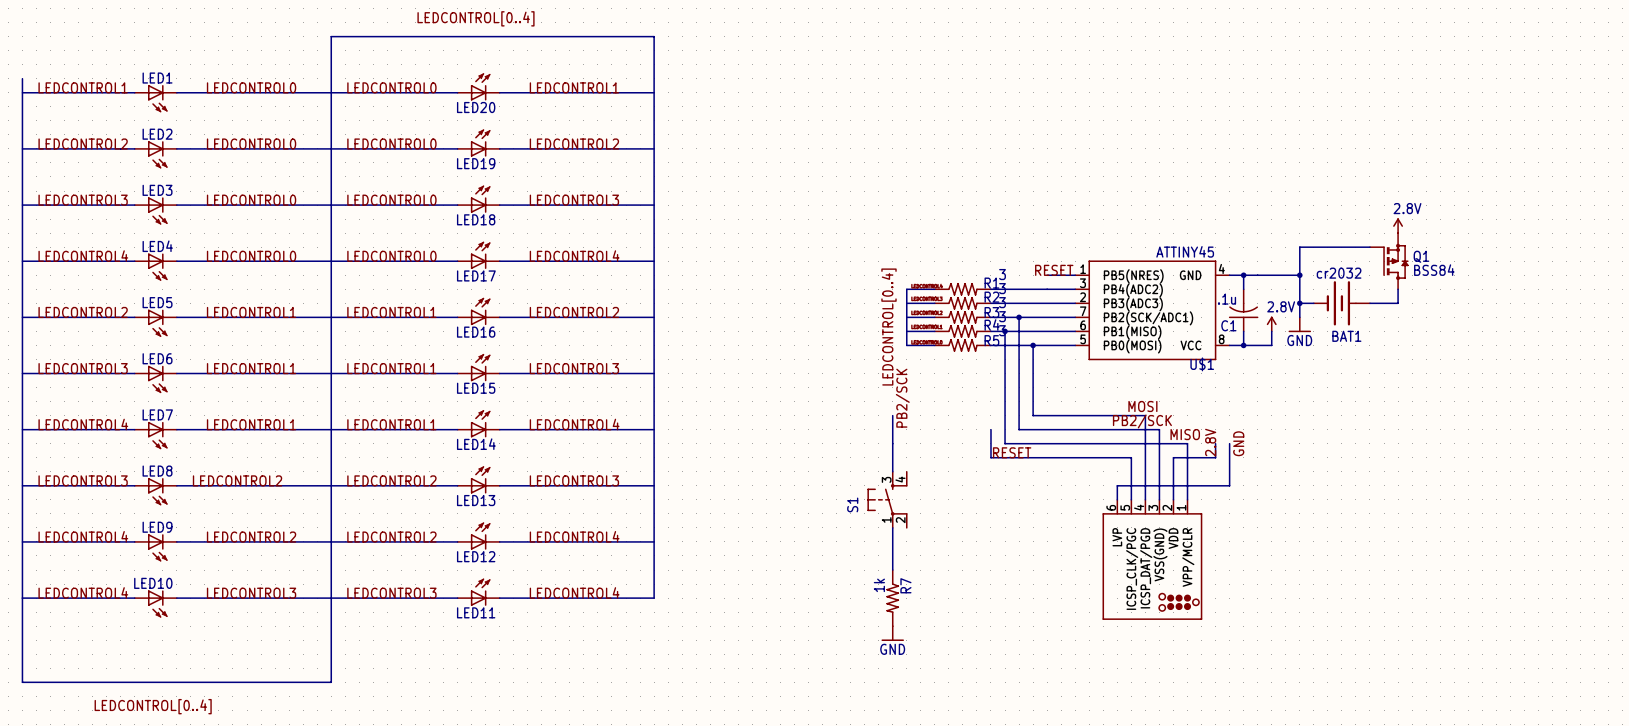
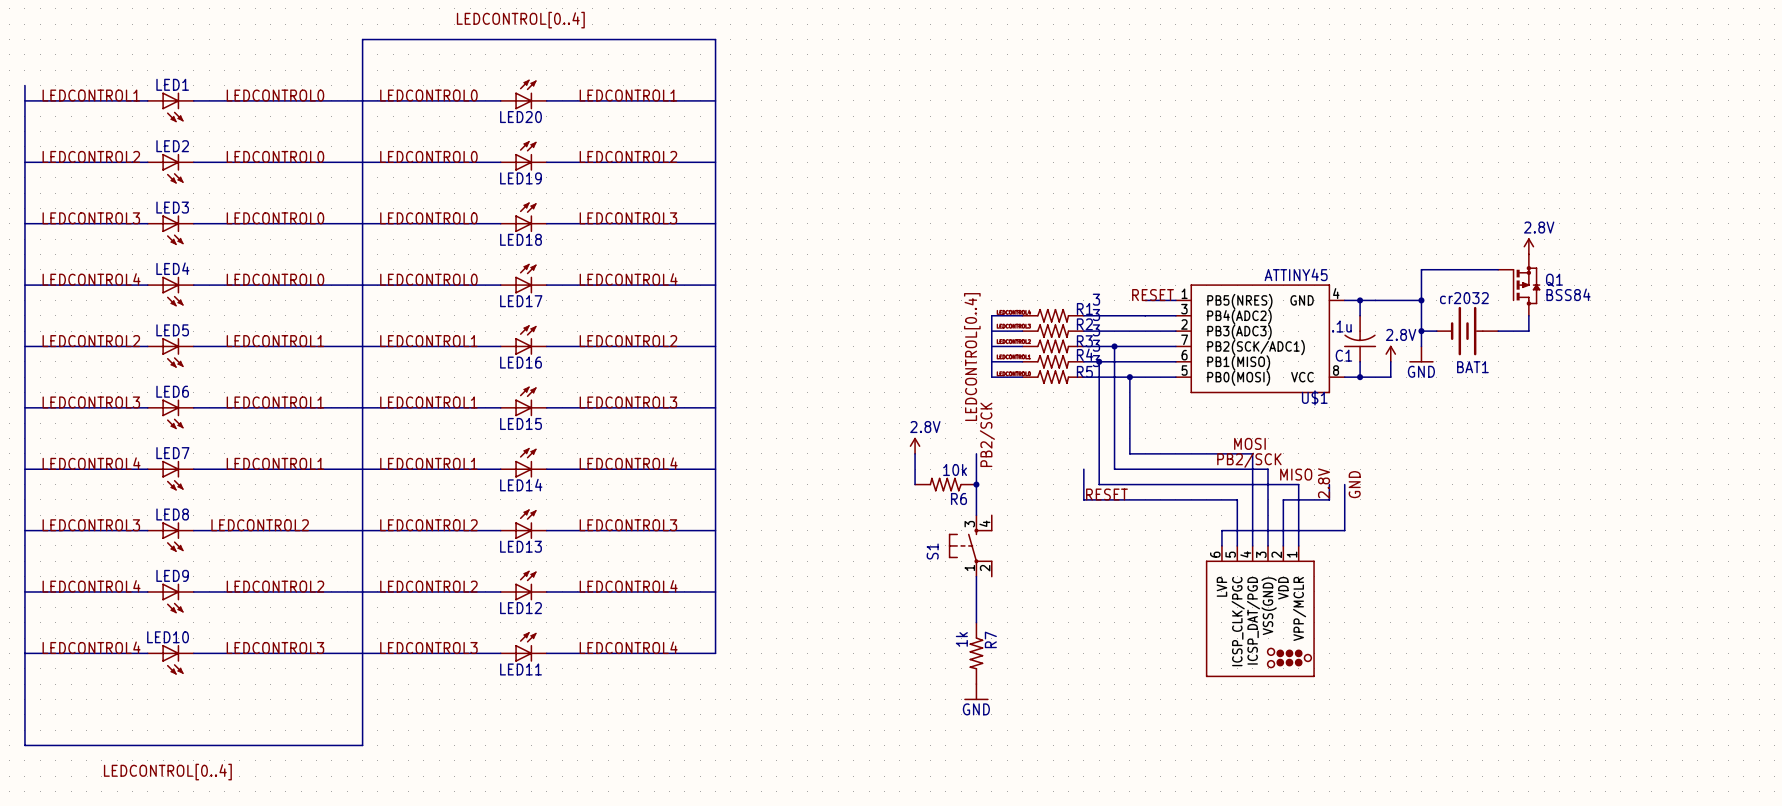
power symbol: none -> 2.8V (915, 445)
wire: none -> (915, 453) (915, 484)
R6: none -> 10k (945, 484)
junction: none -> (976, 484)

